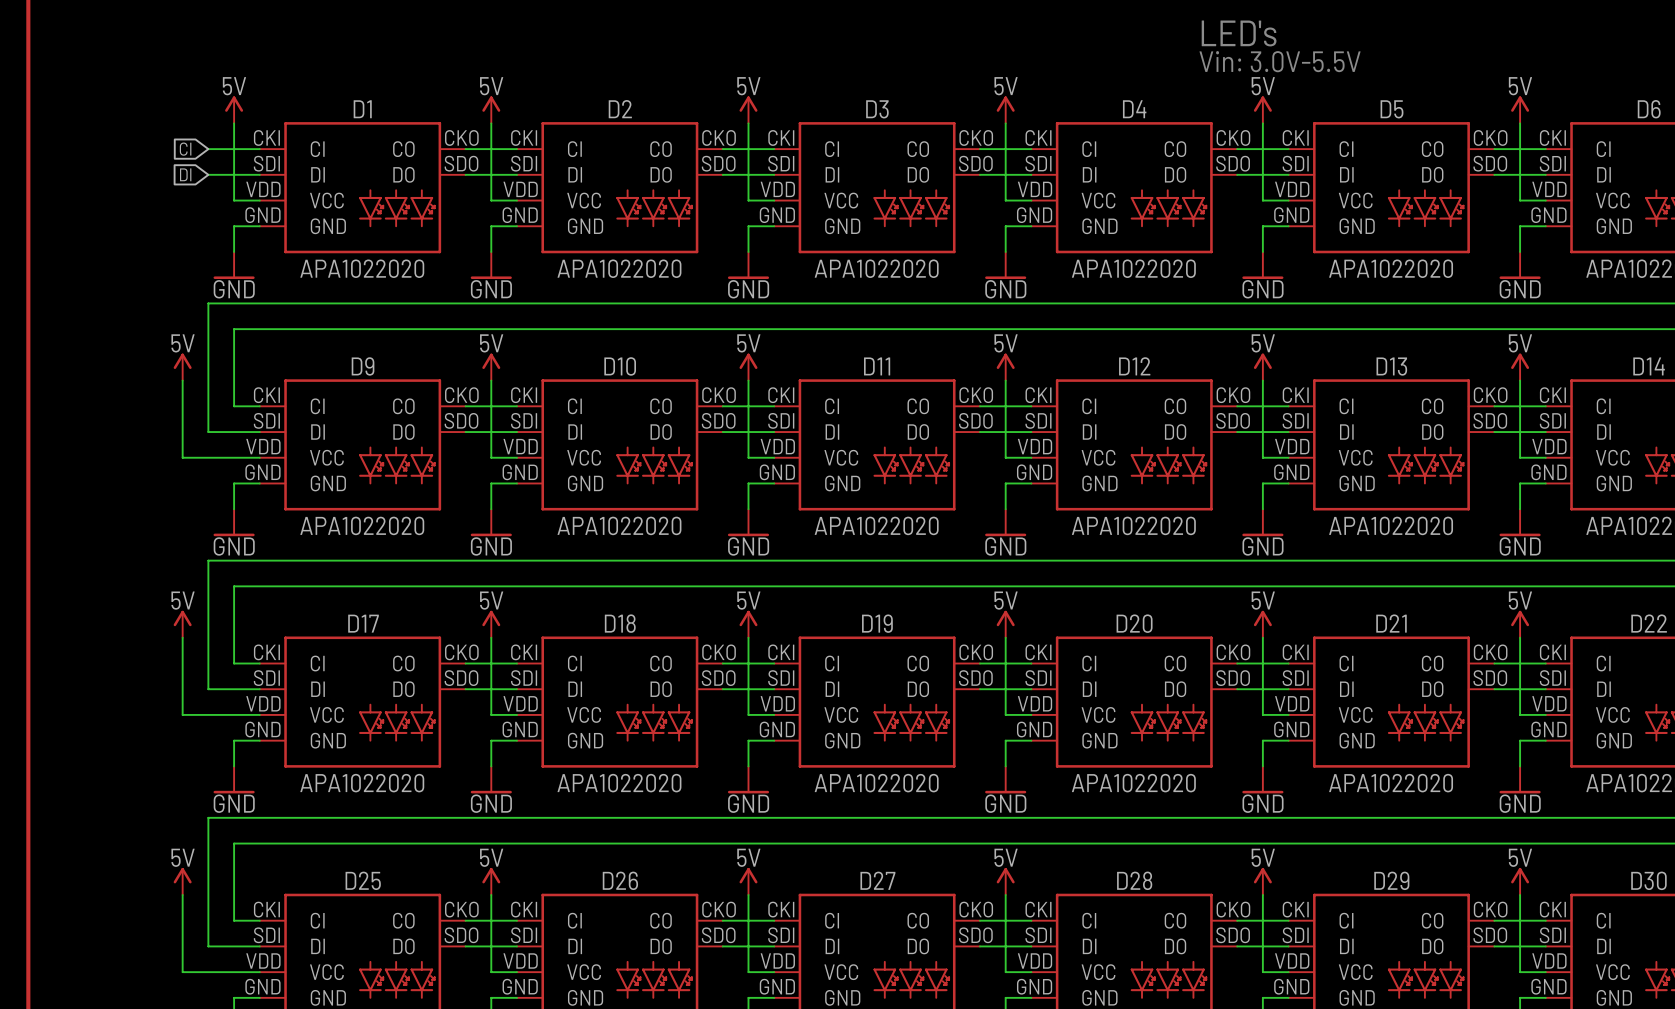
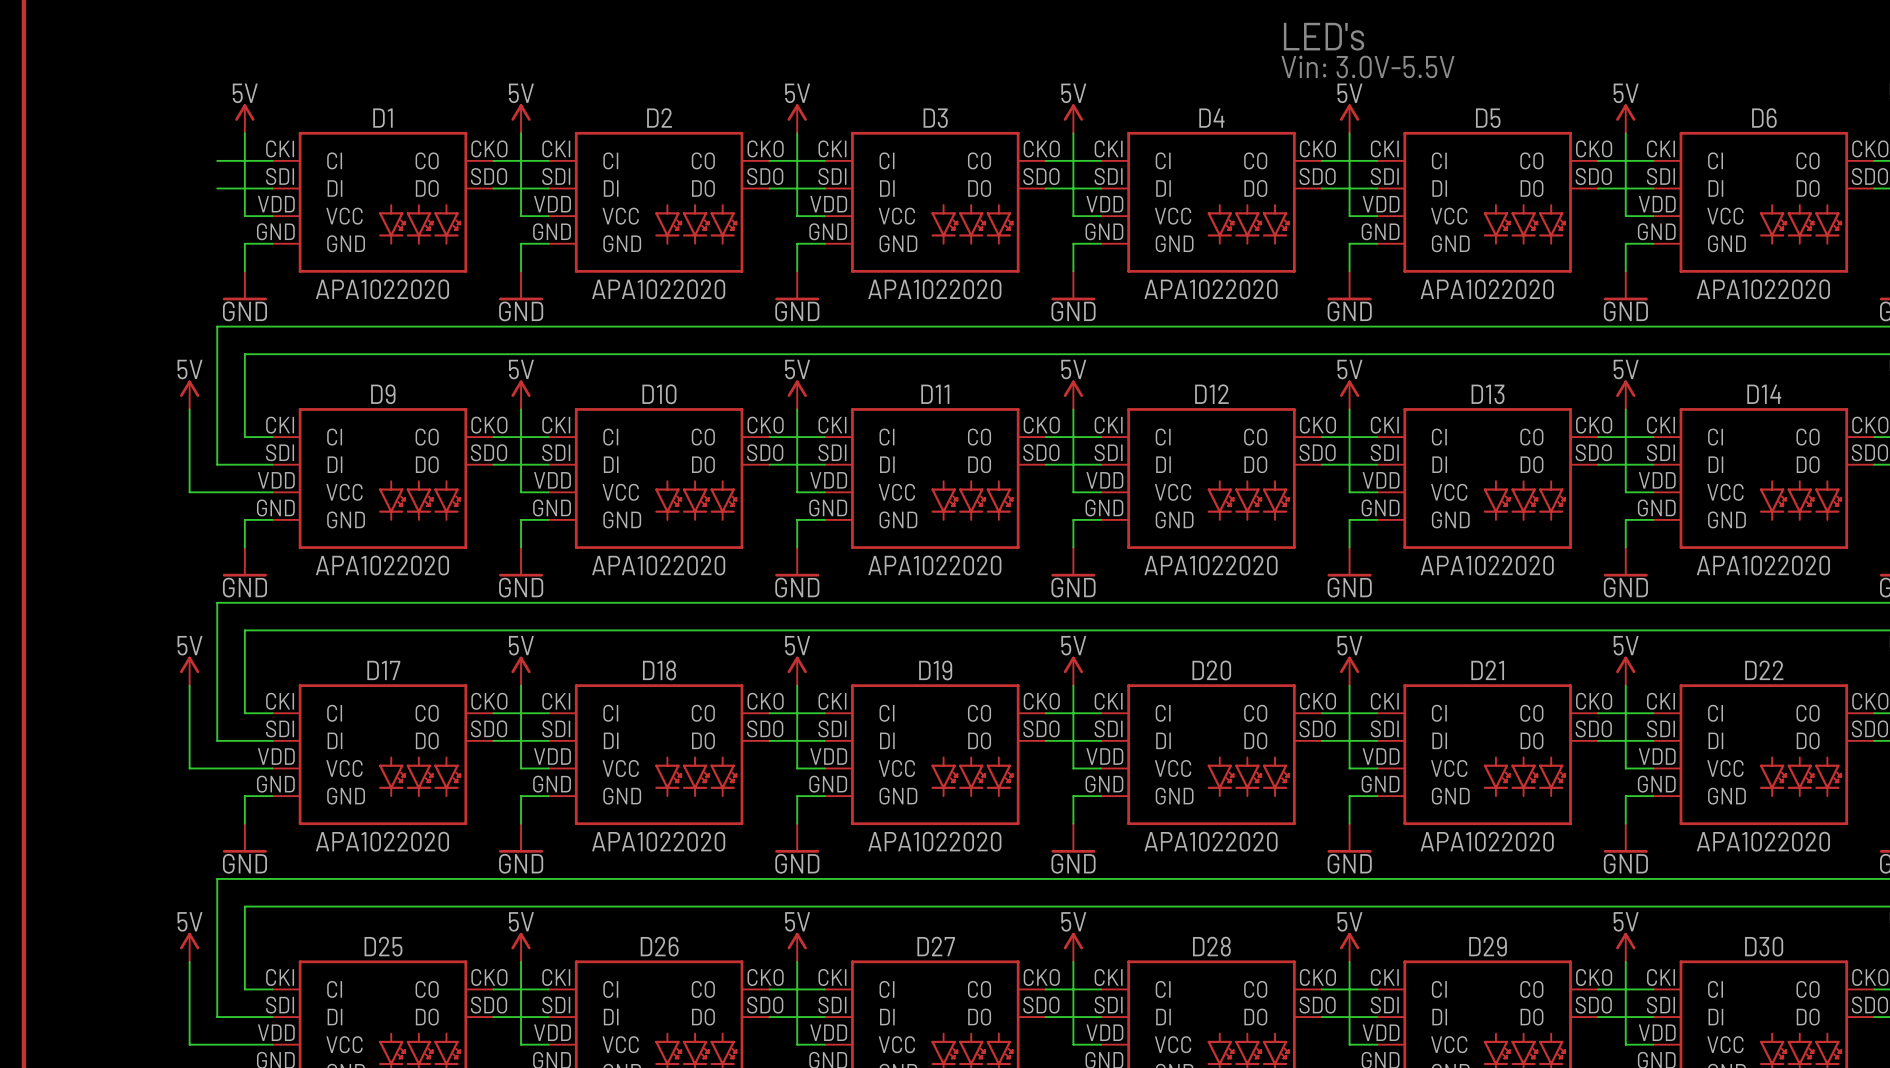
global label: CI (185, 149) -> none
global label: DI (185, 174) -> none

